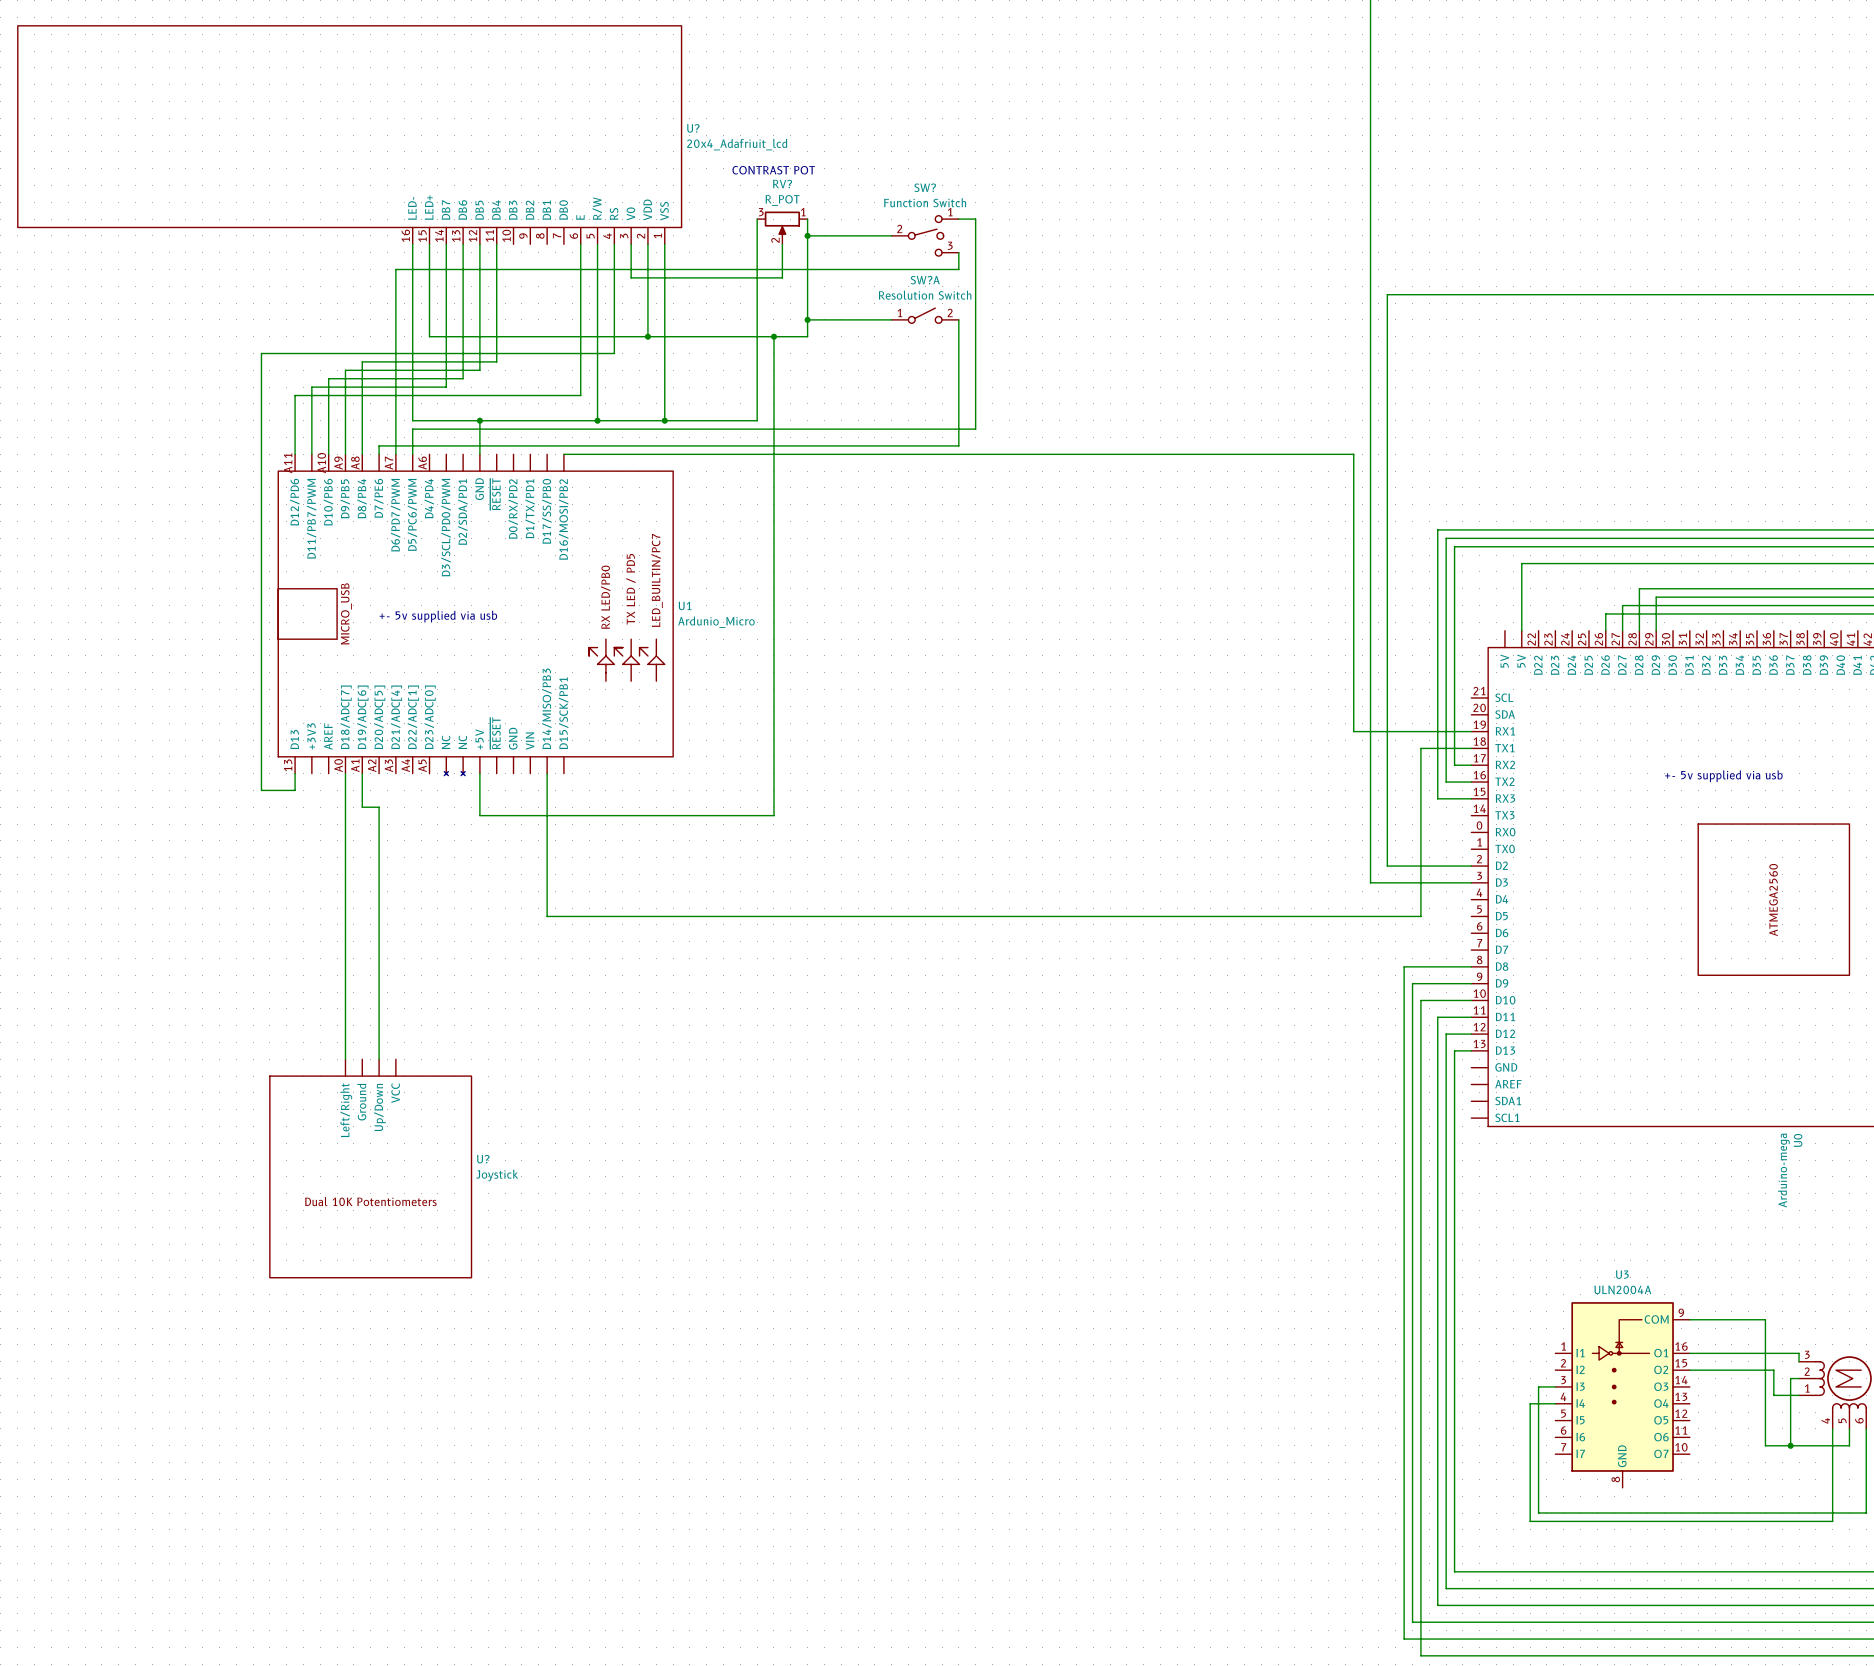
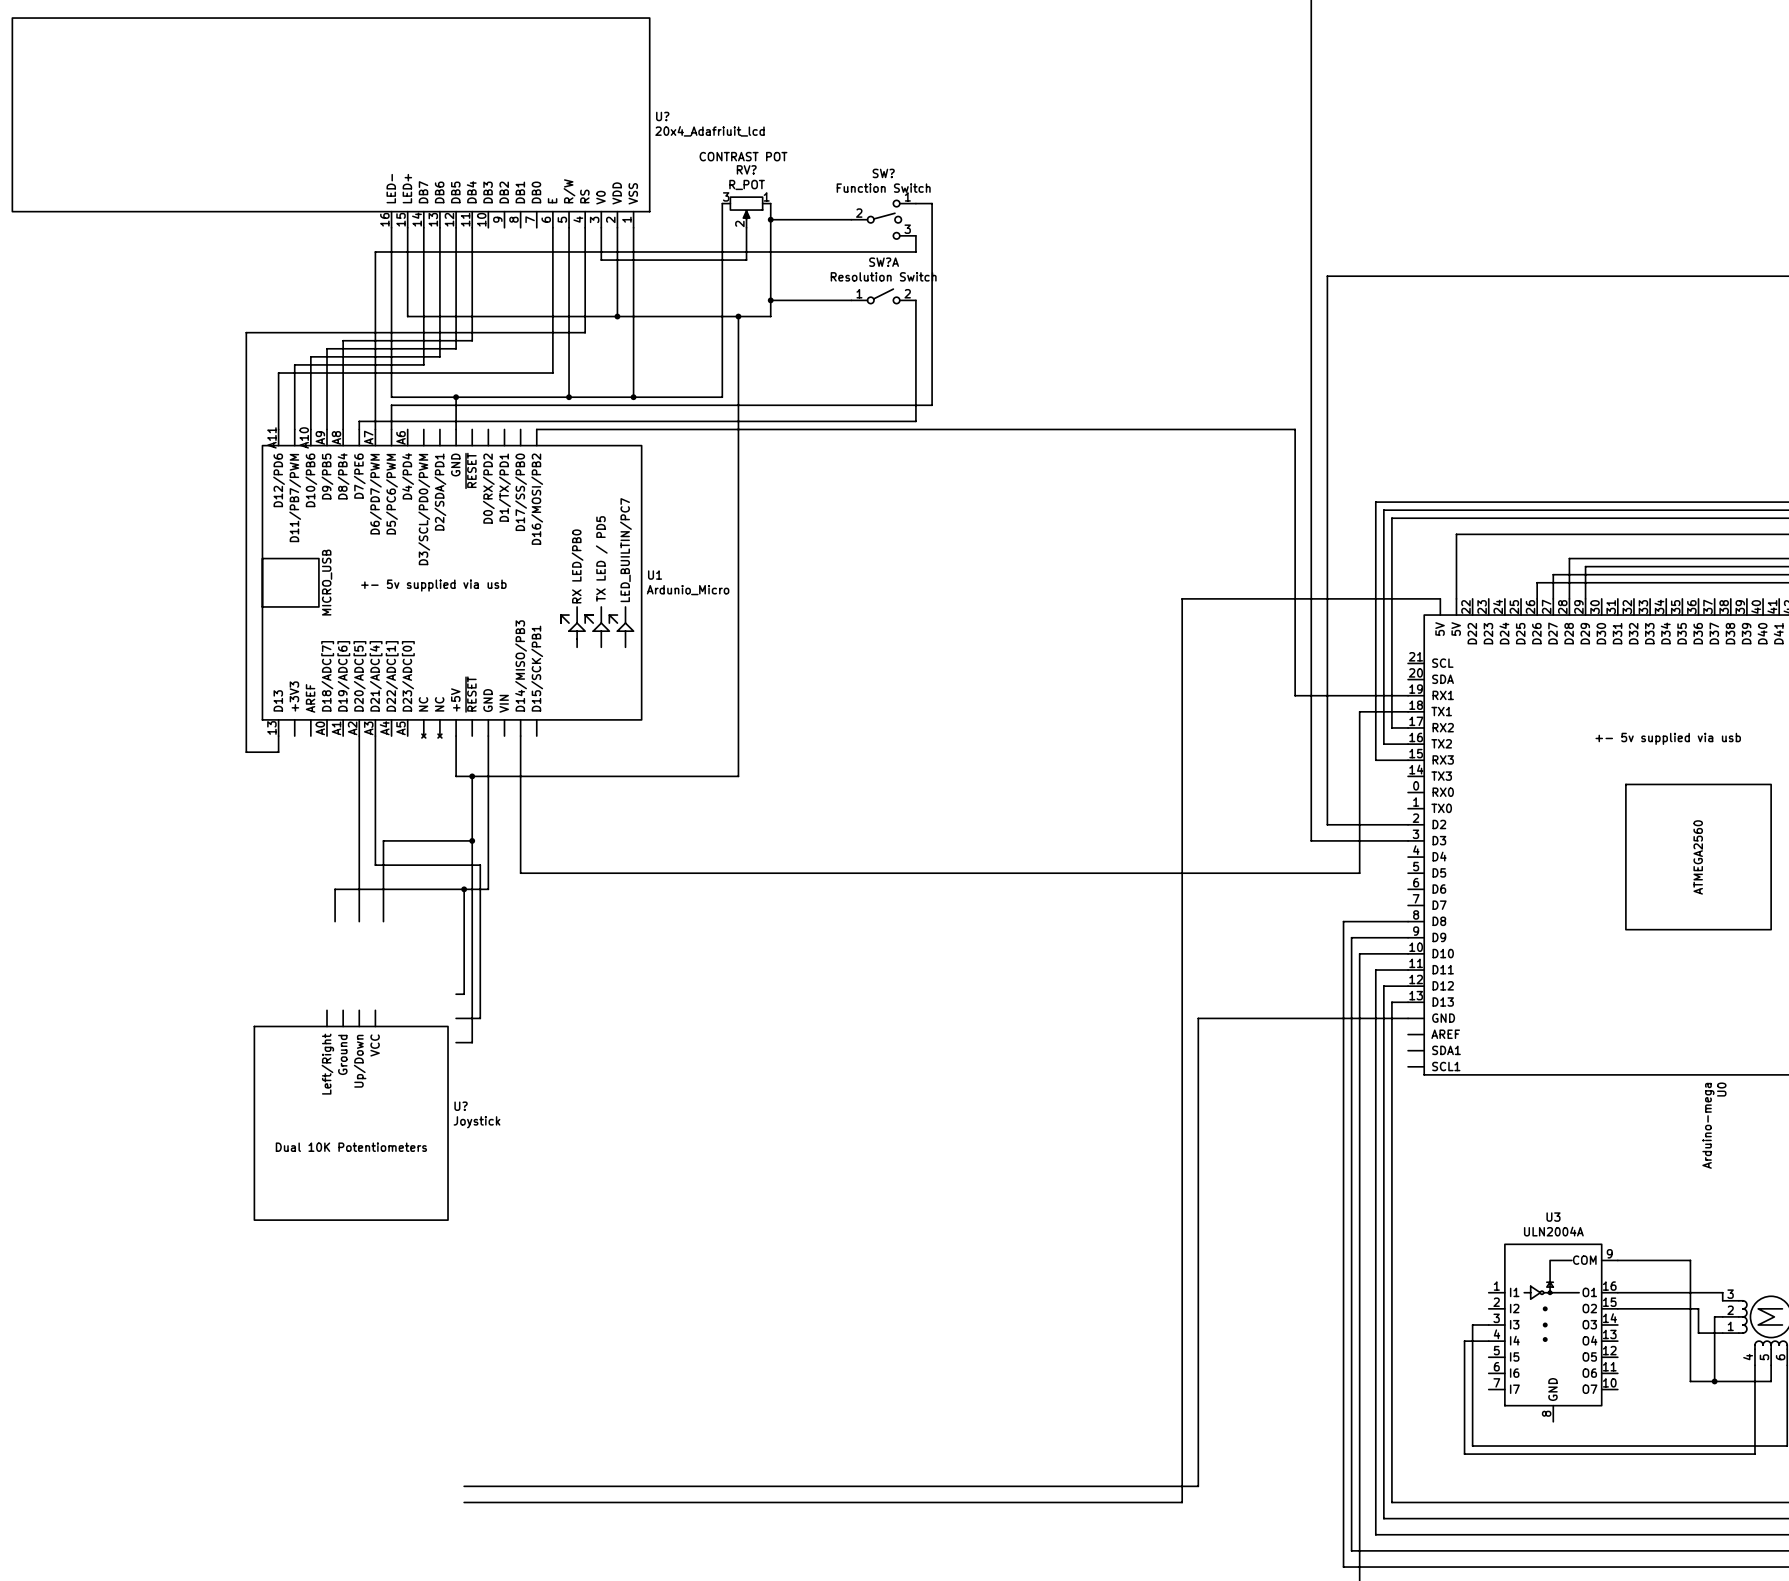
wire: none -> (1440, 598) (1182, 598) (1182, 1502) (464, 1502)
wire: (345, 773) (345, 1059) -> none
wire: (362, 773) (362, 807) (379, 807) -> (359, 736) (359, 768)
wire: none -> (375, 736) (375, 865) (480, 865) (480, 1018) (456, 1018)
wire: none -> (488, 736) (488, 889) (335, 889) (335, 921)
wire: none -> (472, 776) (472, 1042) (456, 1042)
junction: none -> (472, 776)
wire: none -> (472, 840) (383, 840) (383, 921)
junction: none -> (472, 840)
wire: none -> (464, 889) (464, 994) (456, 994)
junction: none -> (464, 889)
wire: (379, 966) (379, 1059) -> none
wire: none -> (1408, 1018) (1198, 1018) (1198, 1486) (464, 1486)

